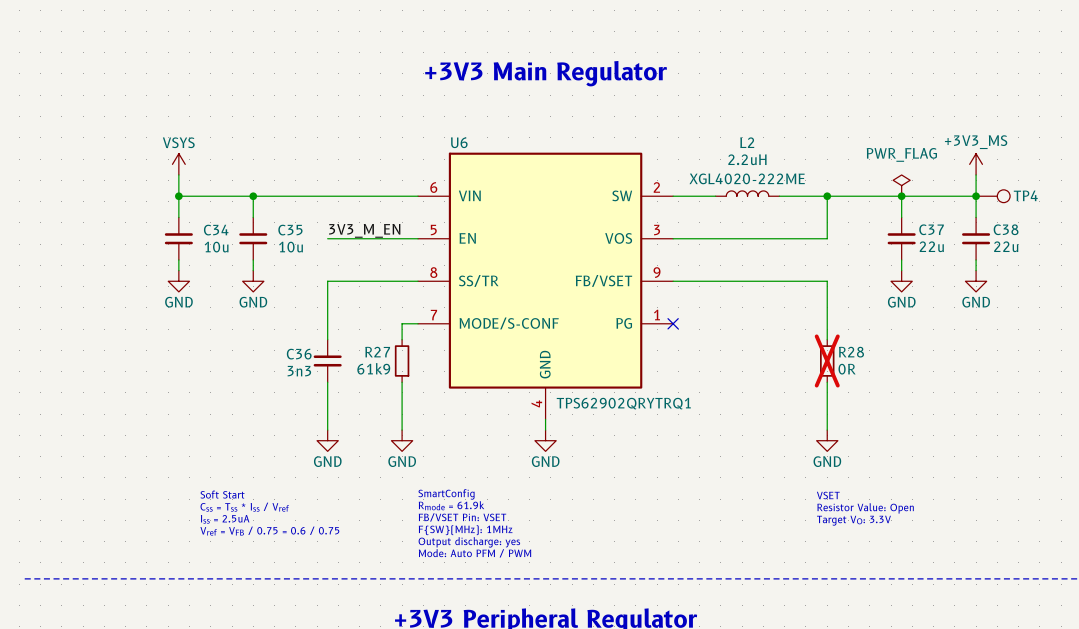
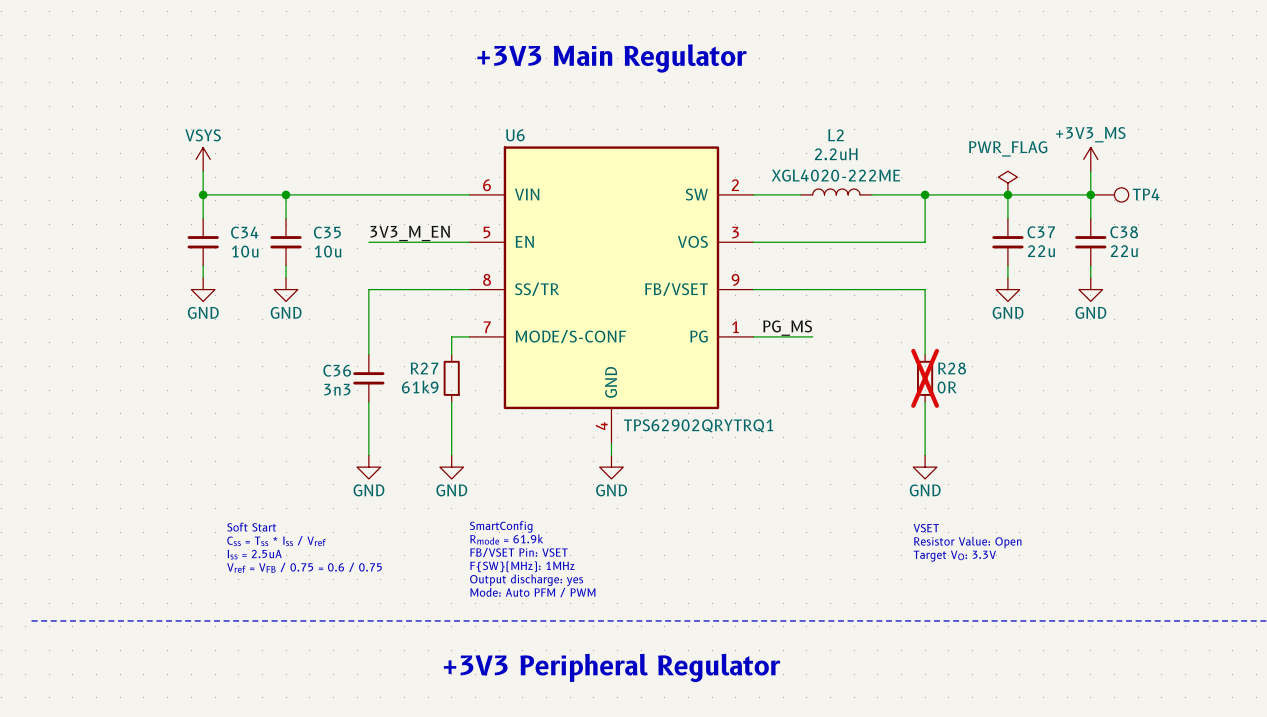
label: none -> PG_MS (787, 328)
wire: none -> (753, 336) (812, 336)
no-connect mark: (673, 323) -> none

